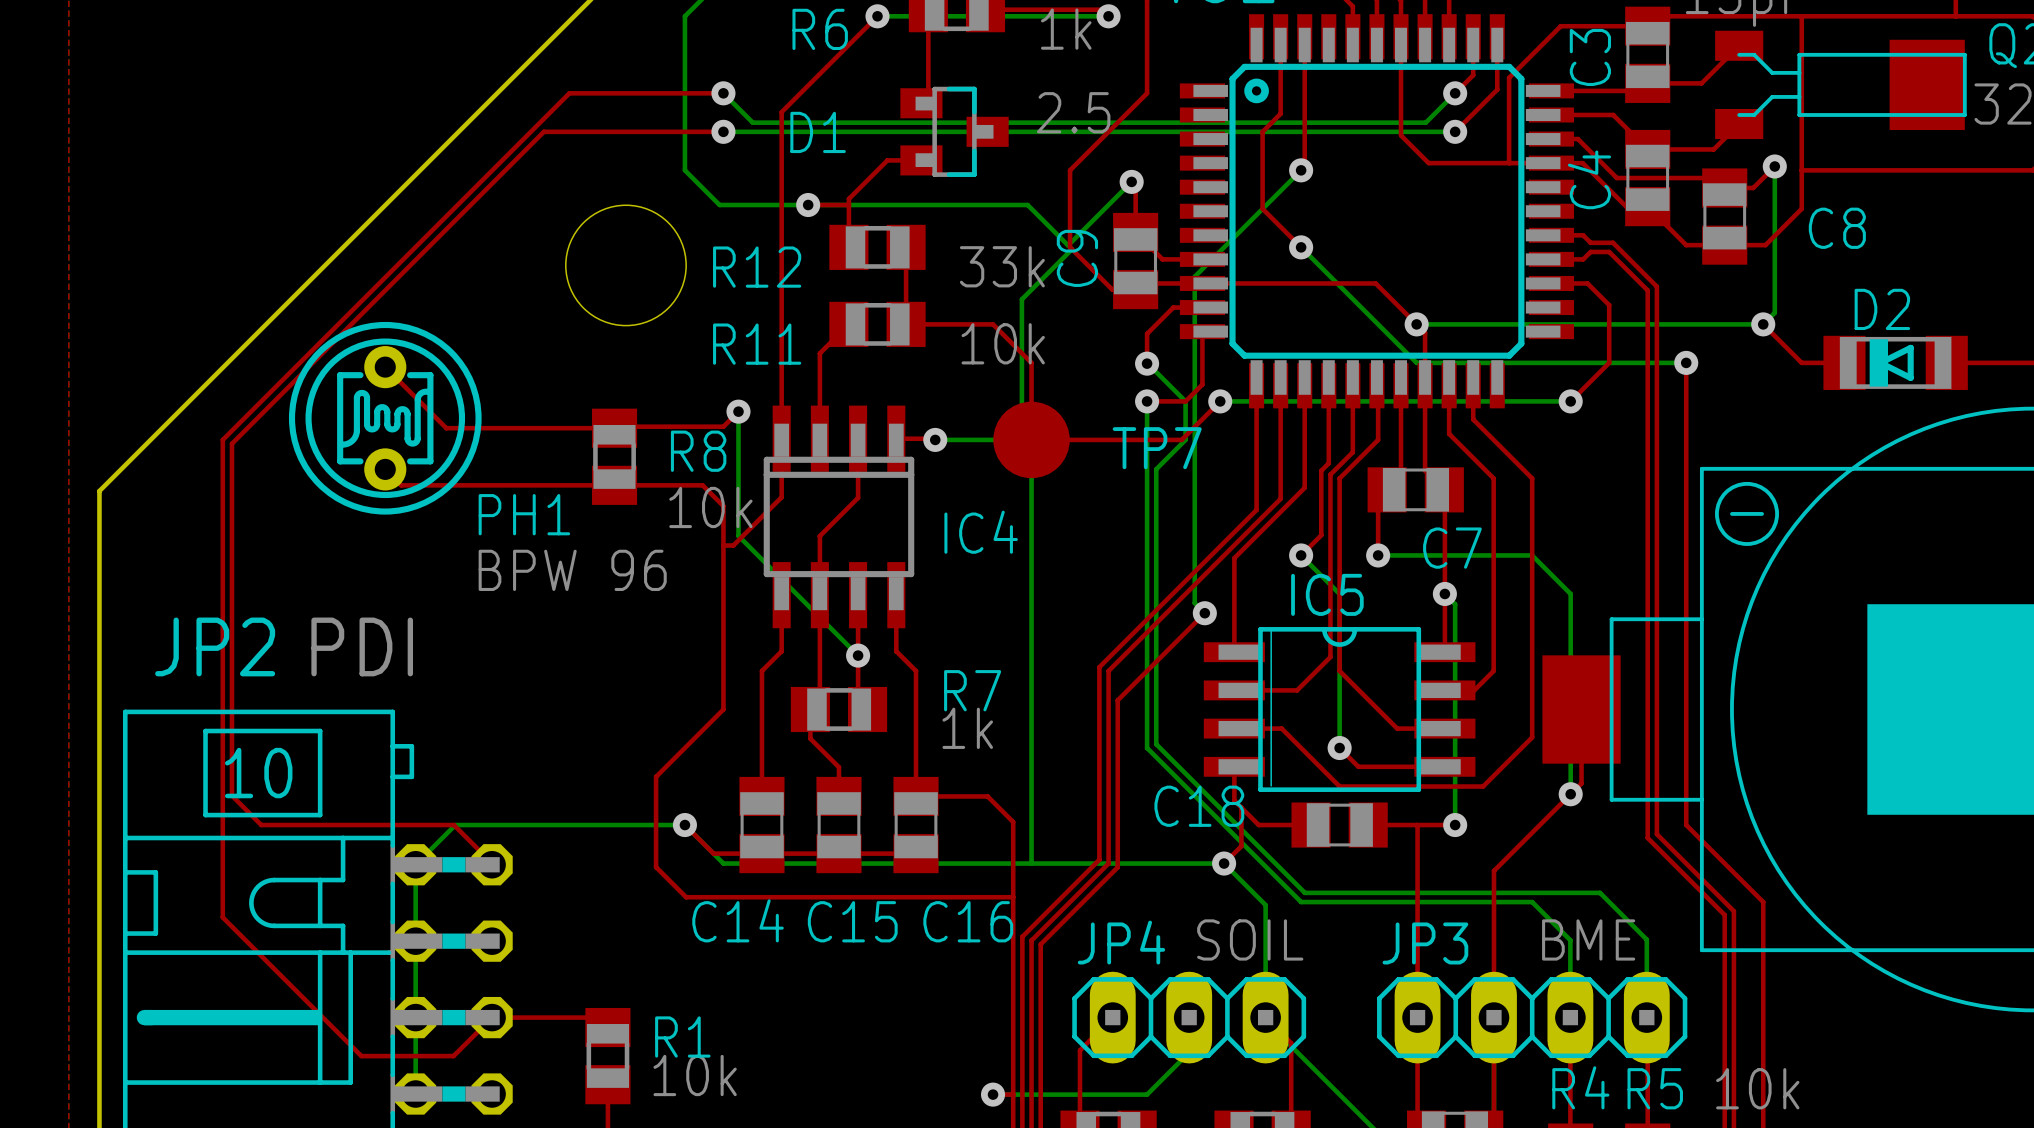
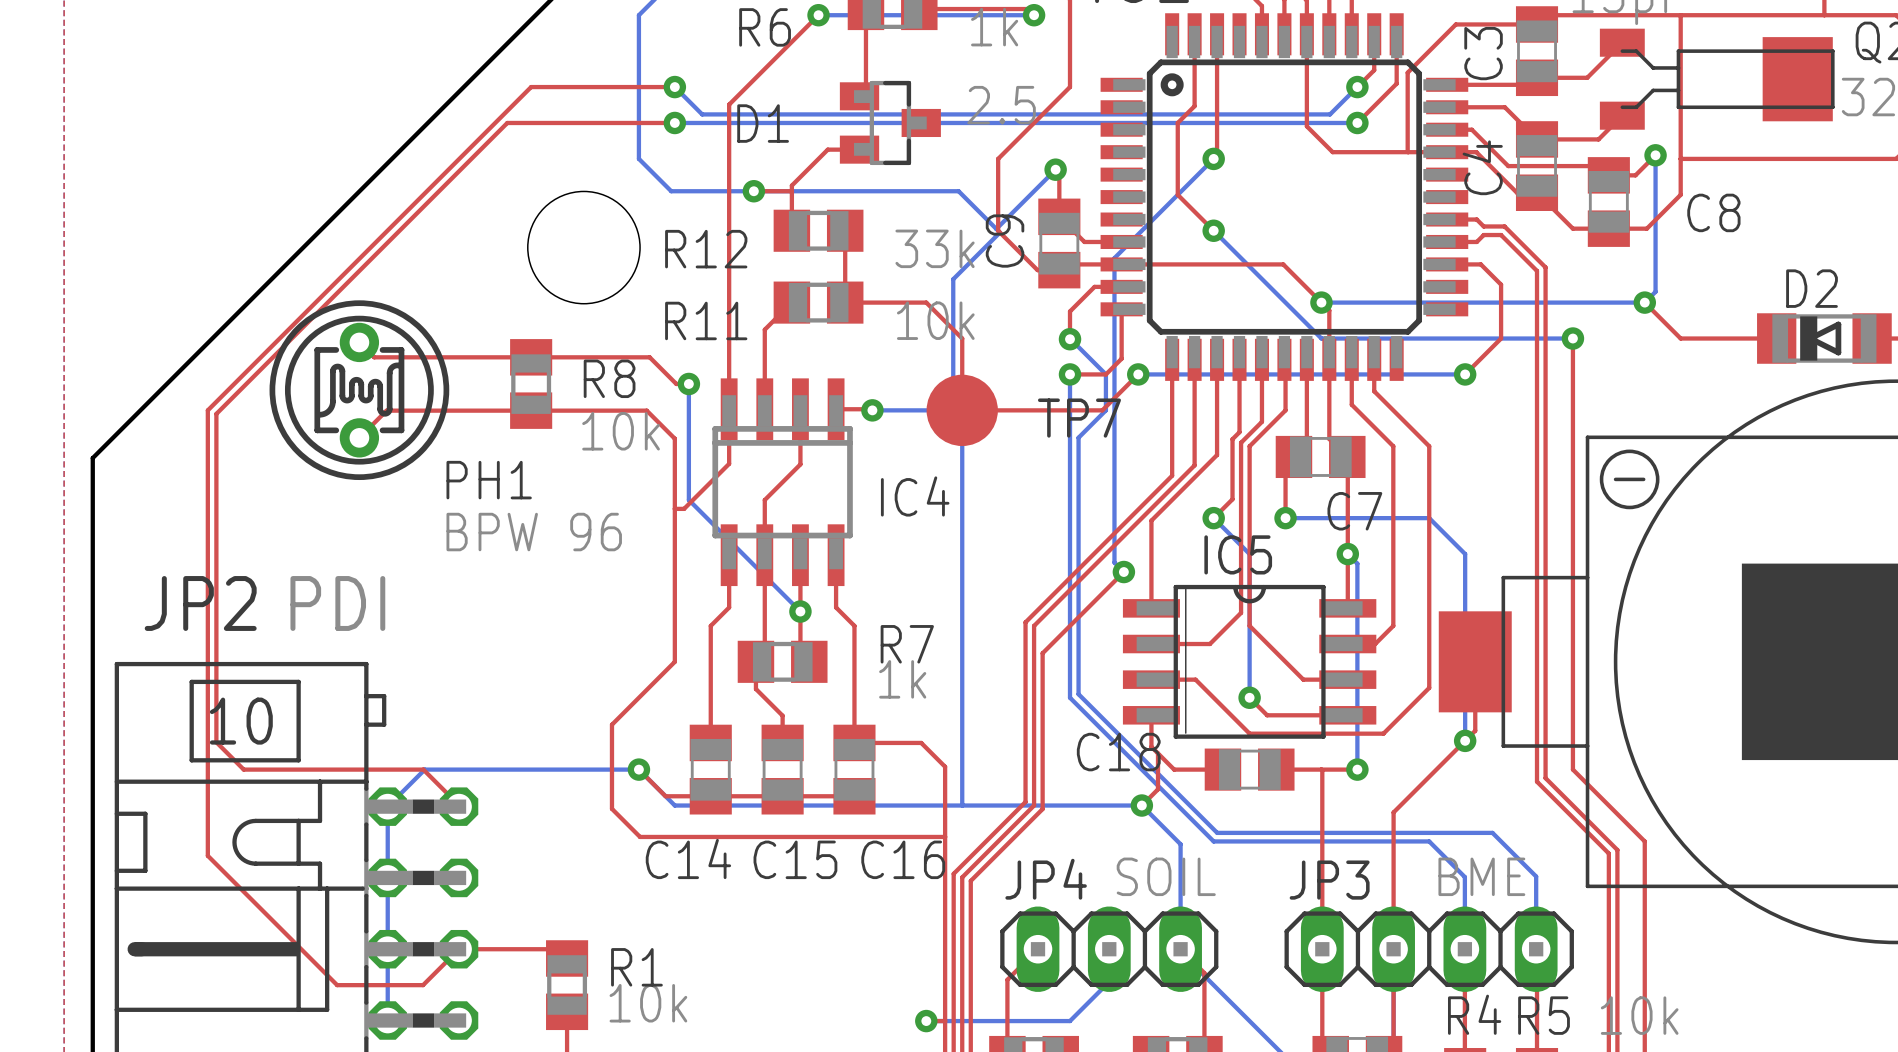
D2 position: (1895, 362) -> (1824, 338)
top track: (1946, 362) (2006, 362) -> (1720, 338) (1776, 338)
top track: (401, 383) (446, 428) (723, 426) (738, 411) -> (374, 357) (649, 357) (676, 383) (688, 383)
R8 position: (614, 456) -> (531, 383)
top track: (385, 469) (401, 485) (702, 485) (723, 506) -> (359, 437) (386, 410) (646, 410) (674, 438) (674, 472)

